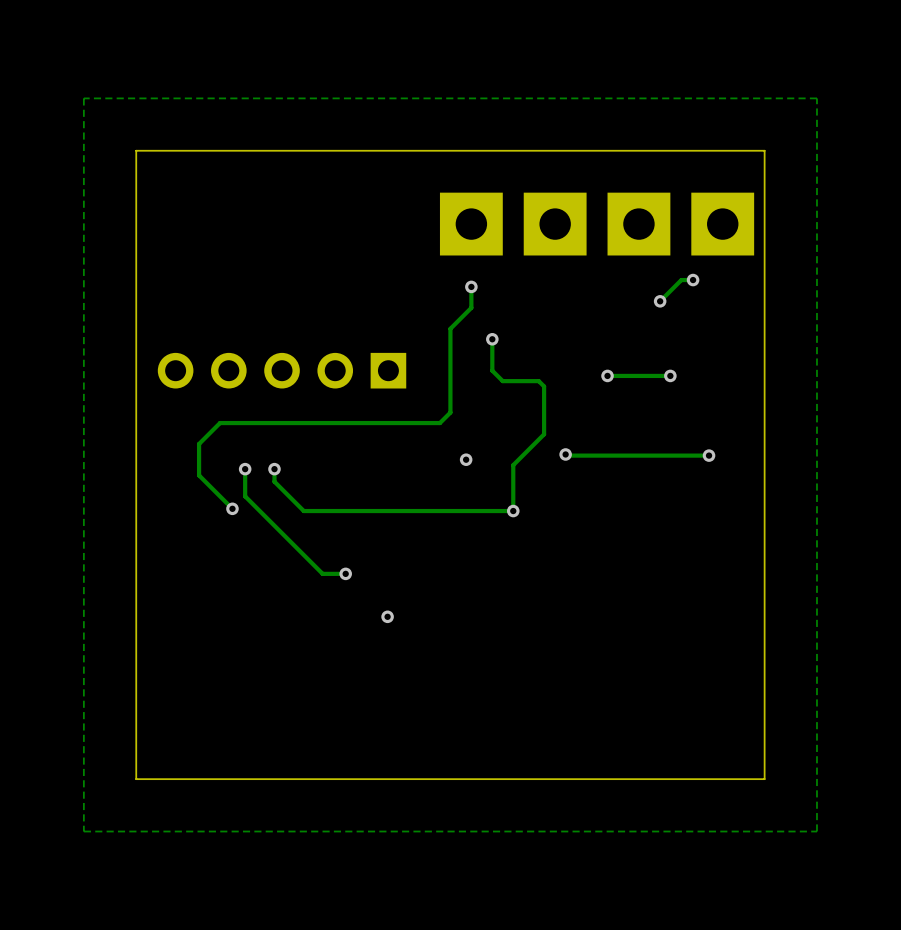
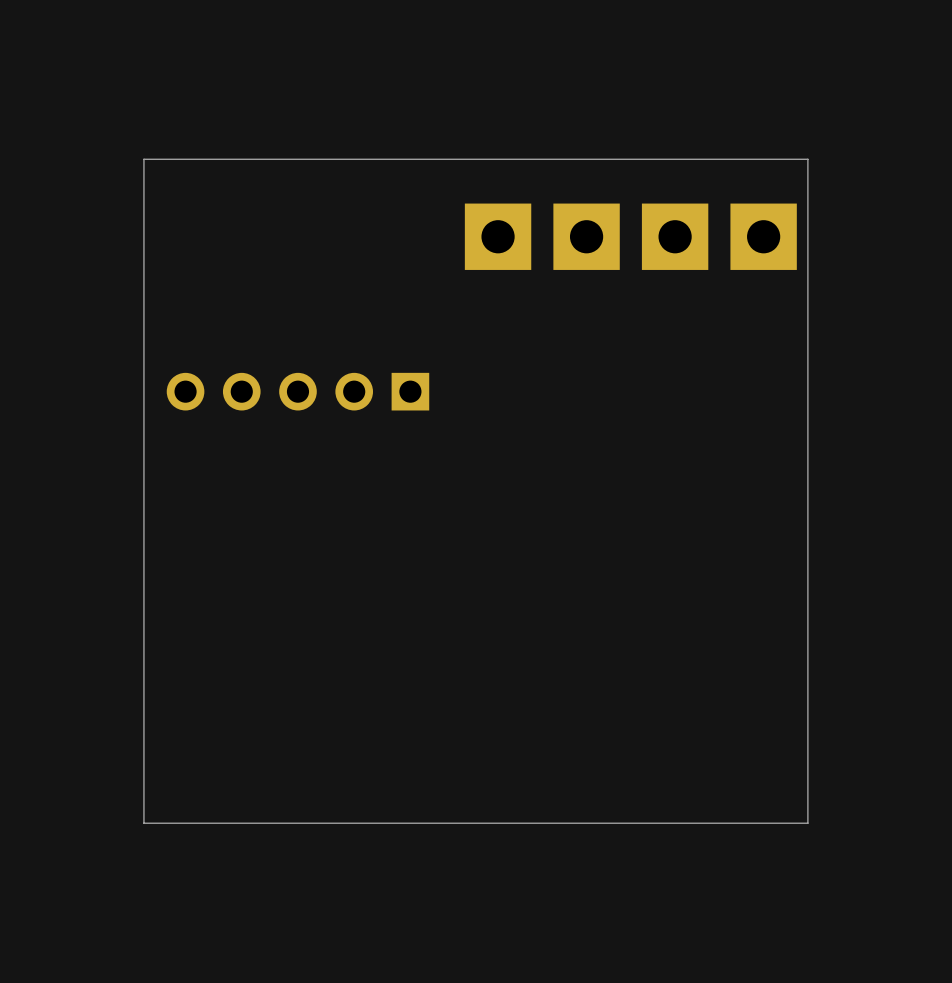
zone outline: (816, 98) (83, 98) (83, 831) (816, 831) (816, 98) -> none
track: (693, 280) (681, 280) (660, 301) -> none
via: (693, 280) -> none
track: (471, 286) (471, 307) (450, 328) (450, 412) (439, 423) (220, 423) (199, 444) (199, 475) (232, 508) -> none
via: (471, 286) -> none
via: (660, 301) -> none
track: (492, 339) (492, 370) (502, 381) (538, 381) (544, 386) (544, 434) (513, 465) (513, 511) (303, 511) (274, 481) (274, 469) -> none
via: (492, 339) -> none
via: (607, 375) -> none
track: (670, 375) (607, 375) -> none
via: (670, 375) -> none
track: (565, 454) (709, 455) -> none
via: (565, 454) -> none
via: (709, 455) -> none
via: (466, 459) -> none
track: (245, 469) (245, 496) (322, 573) (345, 573) -> none
via: (245, 469) -> none
via: (274, 469) -> none
via: (232, 508) -> none
via: (513, 511) -> none
via: (345, 573) -> none
via: (387, 616) -> none

